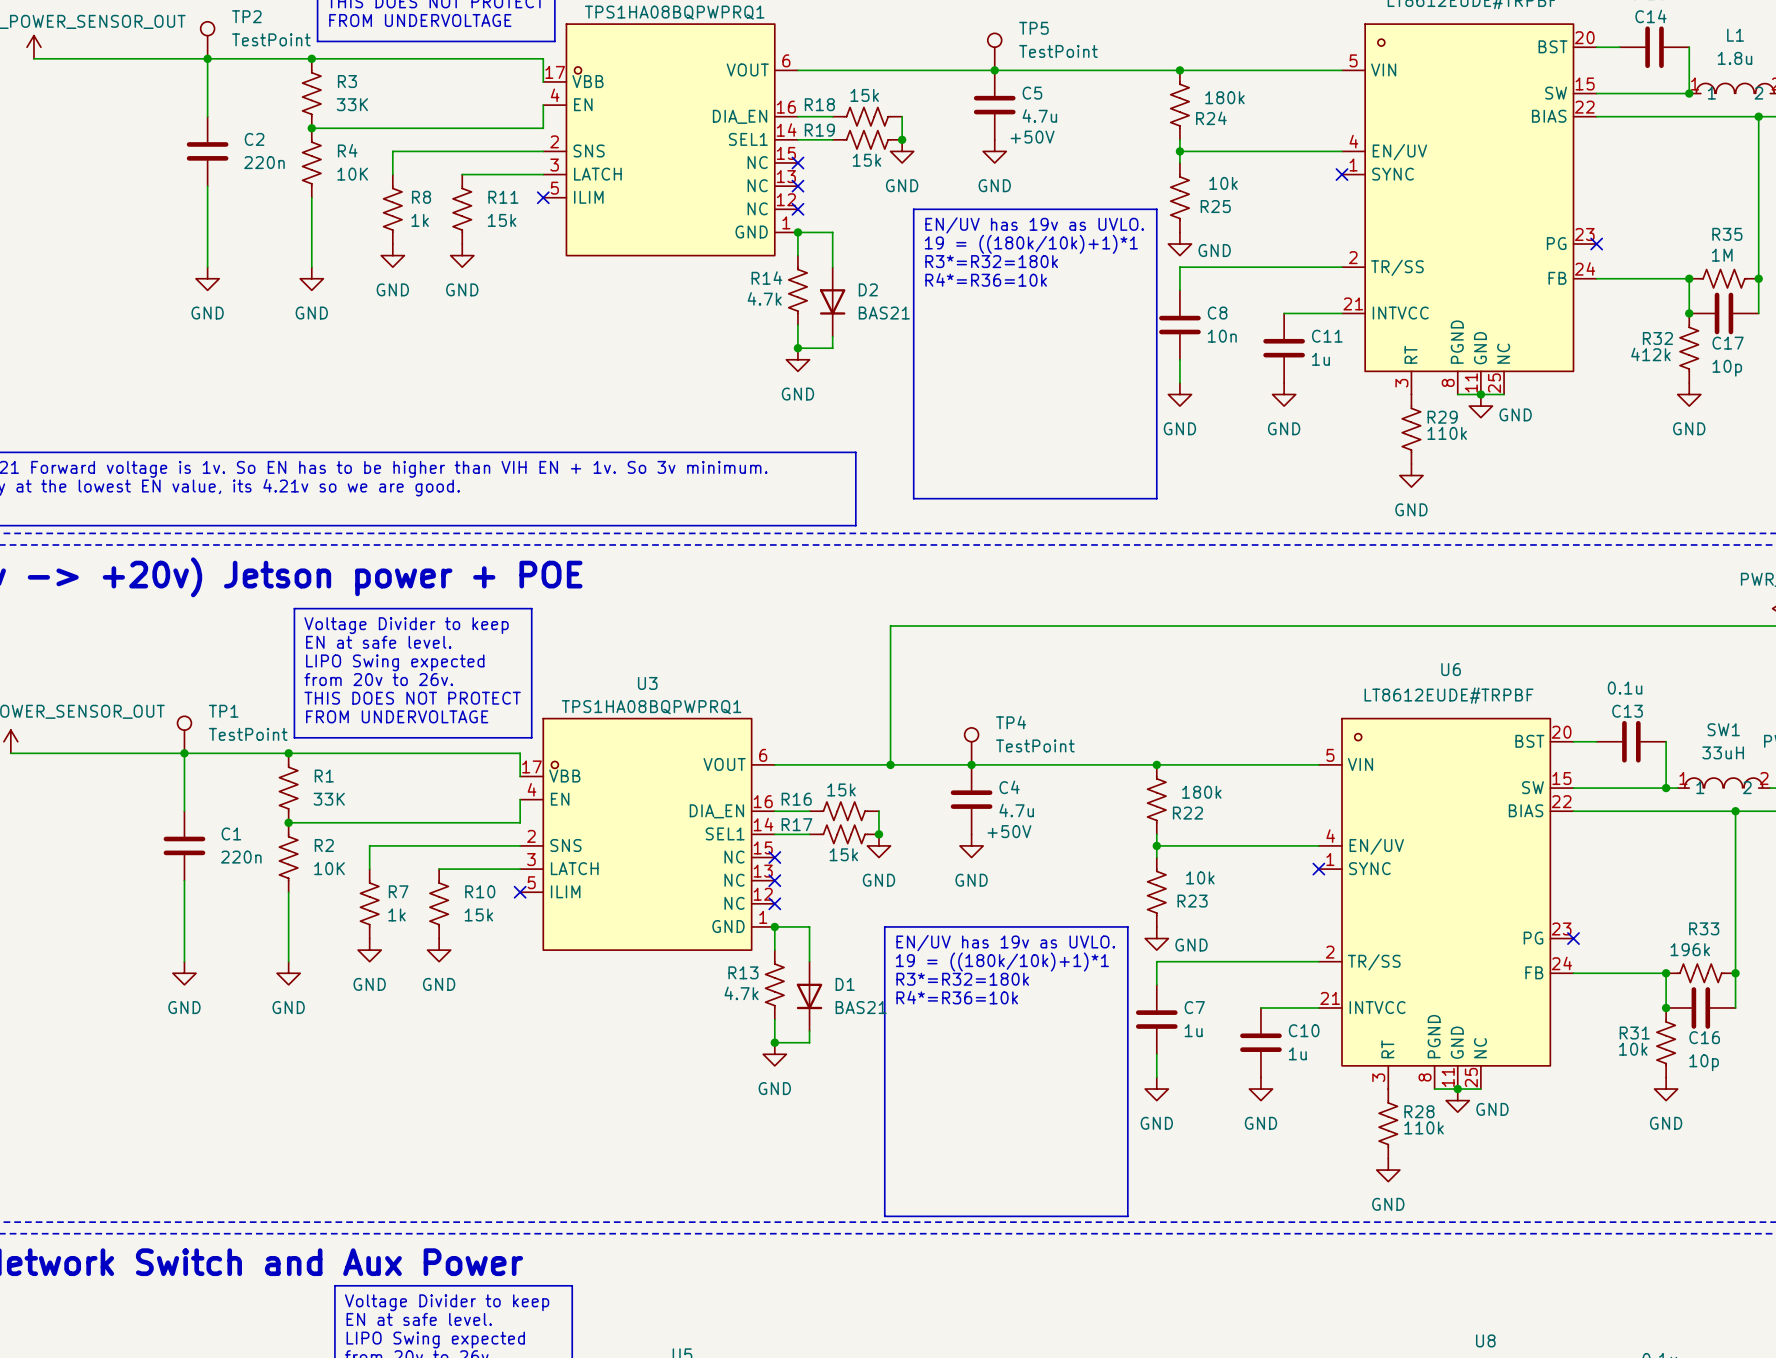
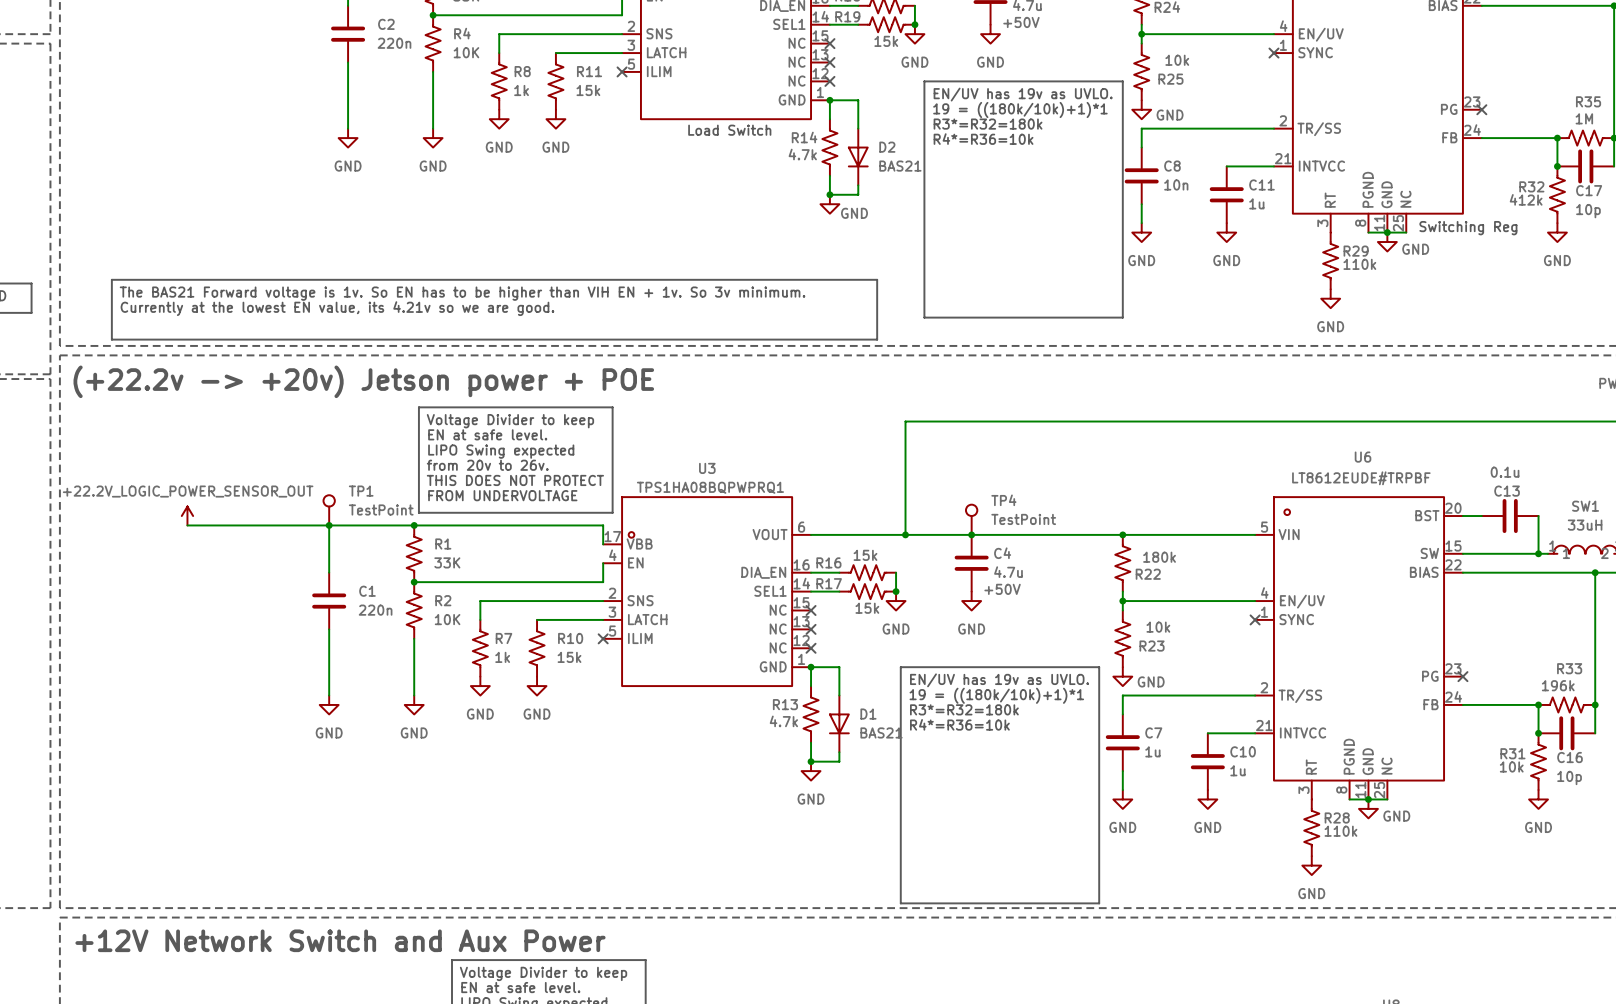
text: none -> Load Switch (729, 130)
text: none -> Switching Reg (1468, 228)
power symbol text position: GND (797, 394) -> GND (854, 213)

